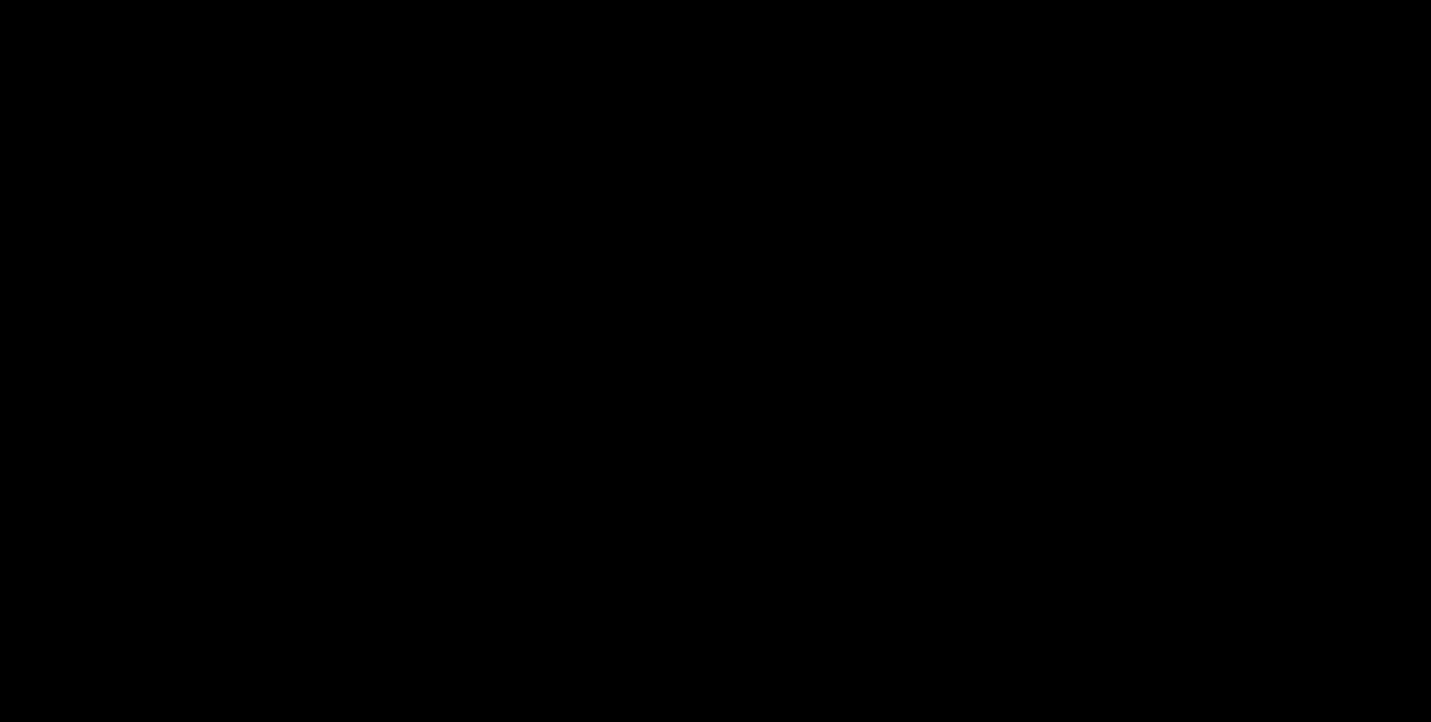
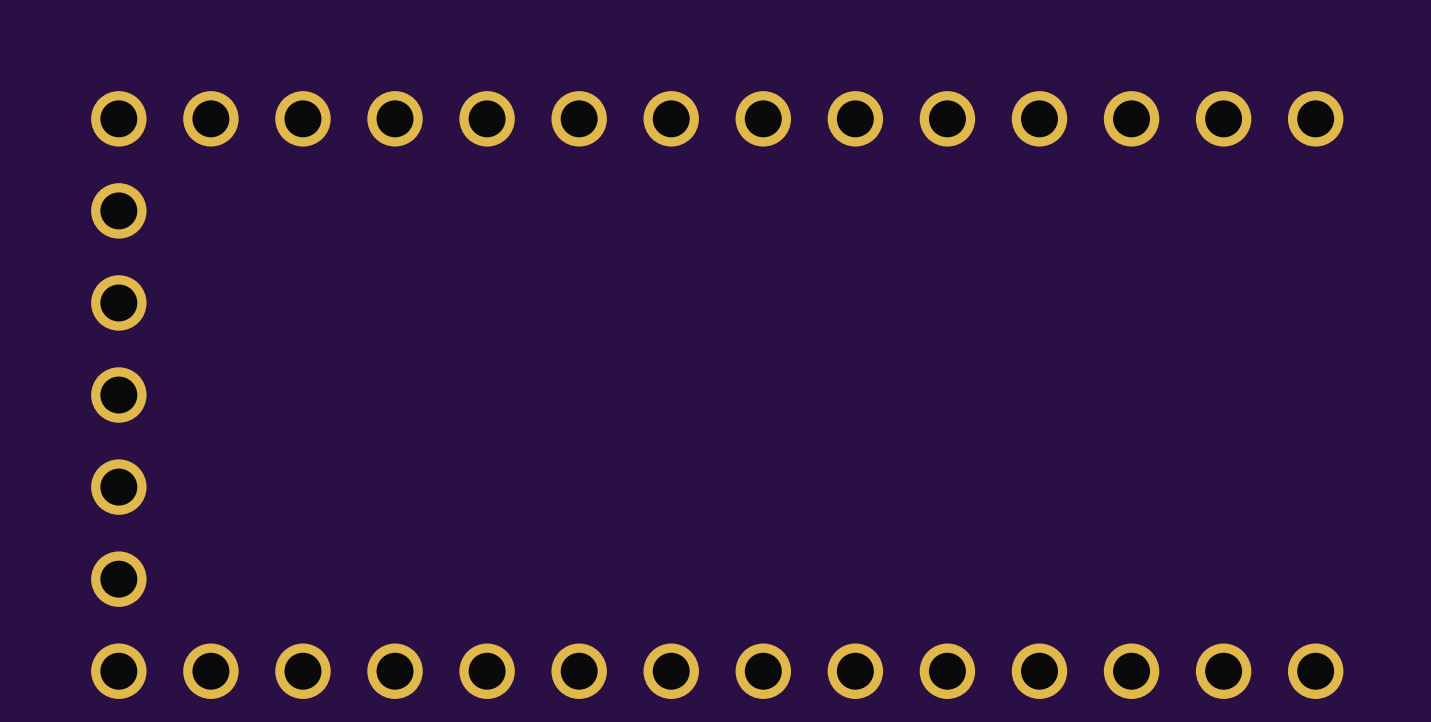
part: none -> (717, 395)

